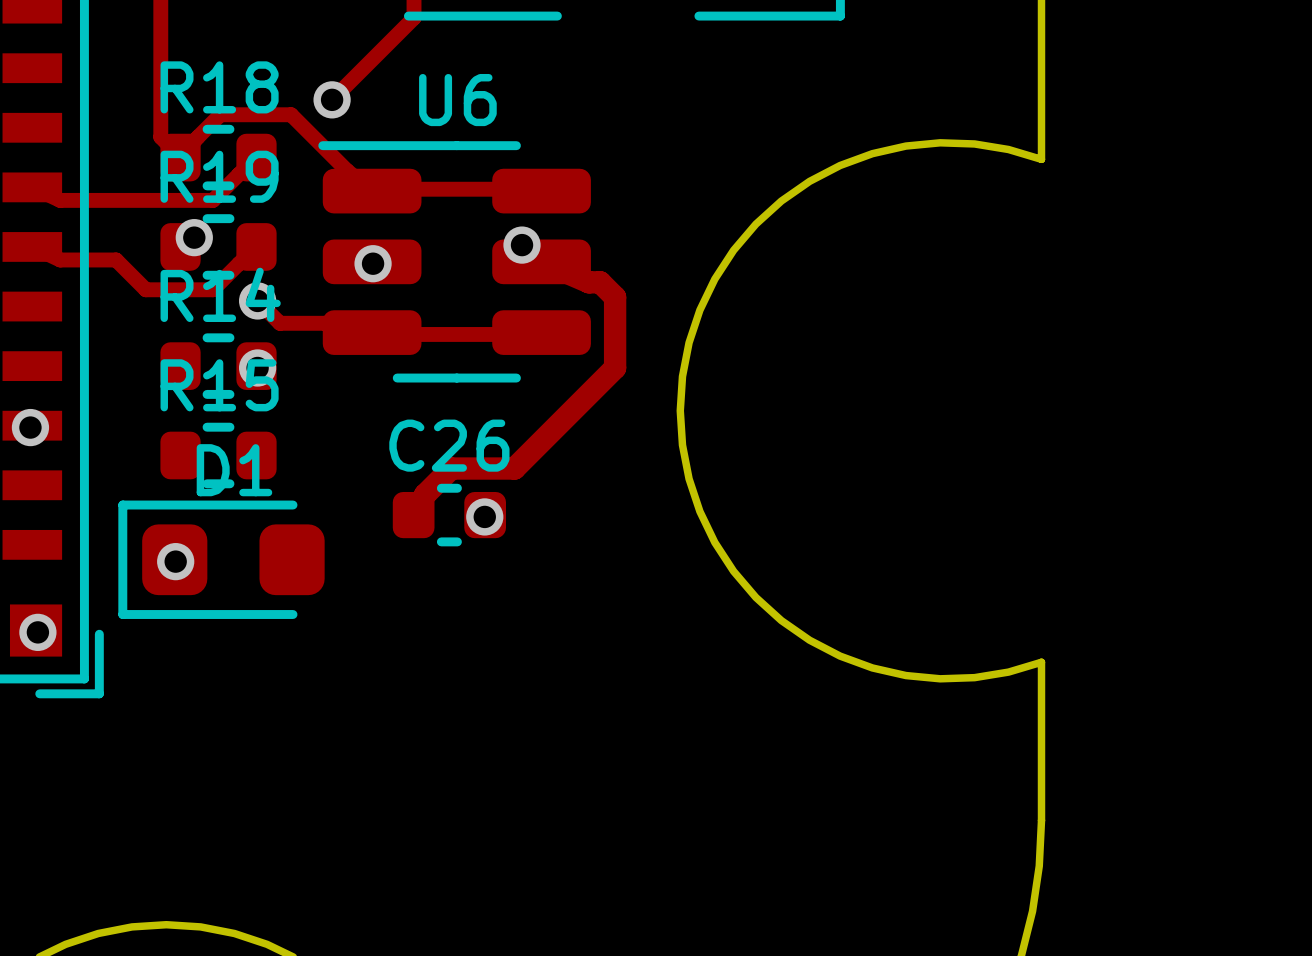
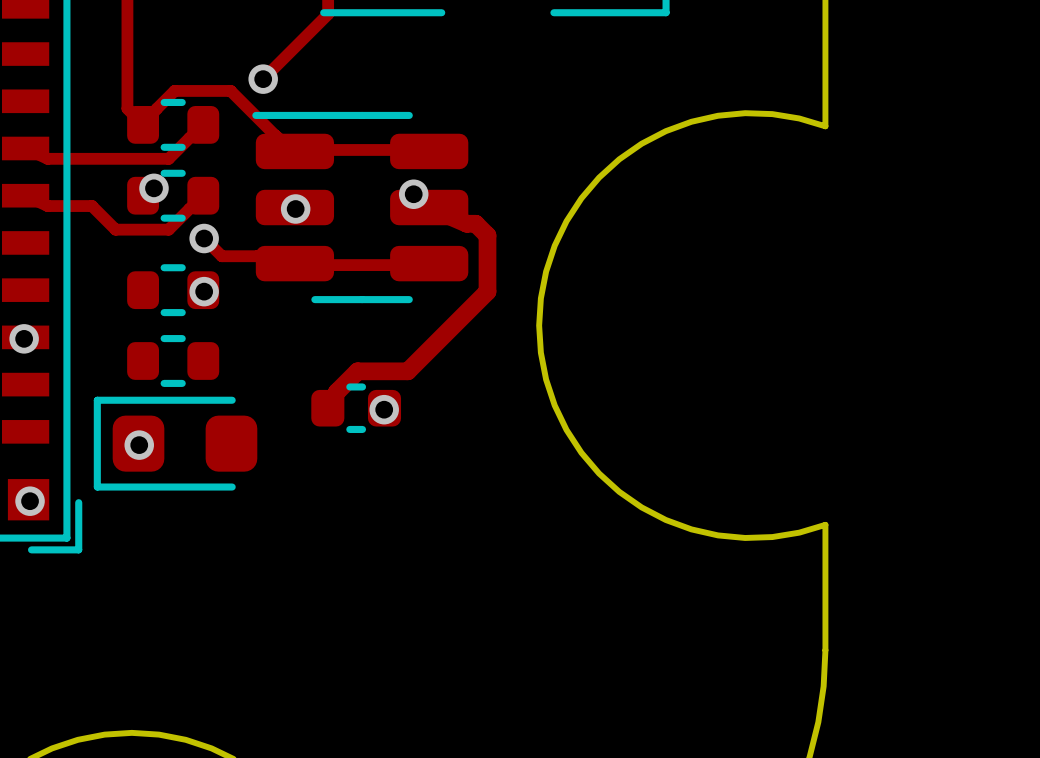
R18 name: R18 (219, 87) -> none
U6 name: U6 (457, 100) -> none
R19 name: R19 (219, 176) -> none
R14 name: R14 (220, 294) -> none
R15 name: R15 (219, 385) -> none
C26 name: C26 (449, 445) -> none
D1 name: D1 (234, 470) -> none

